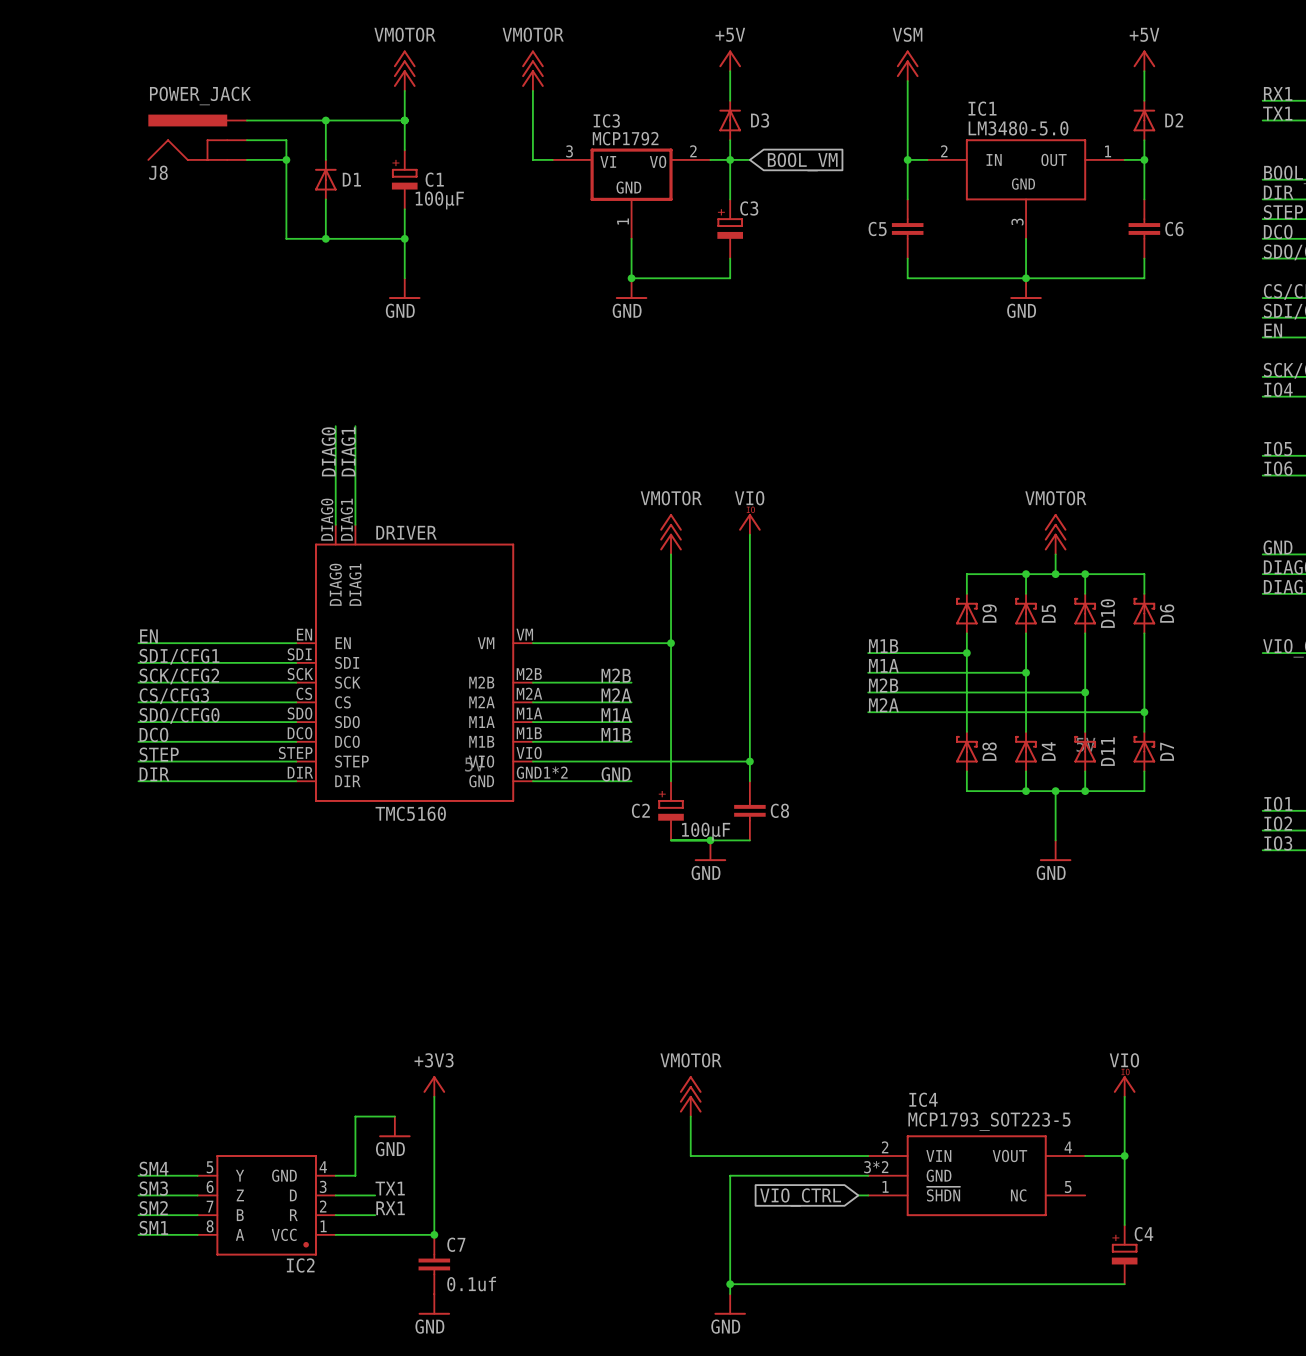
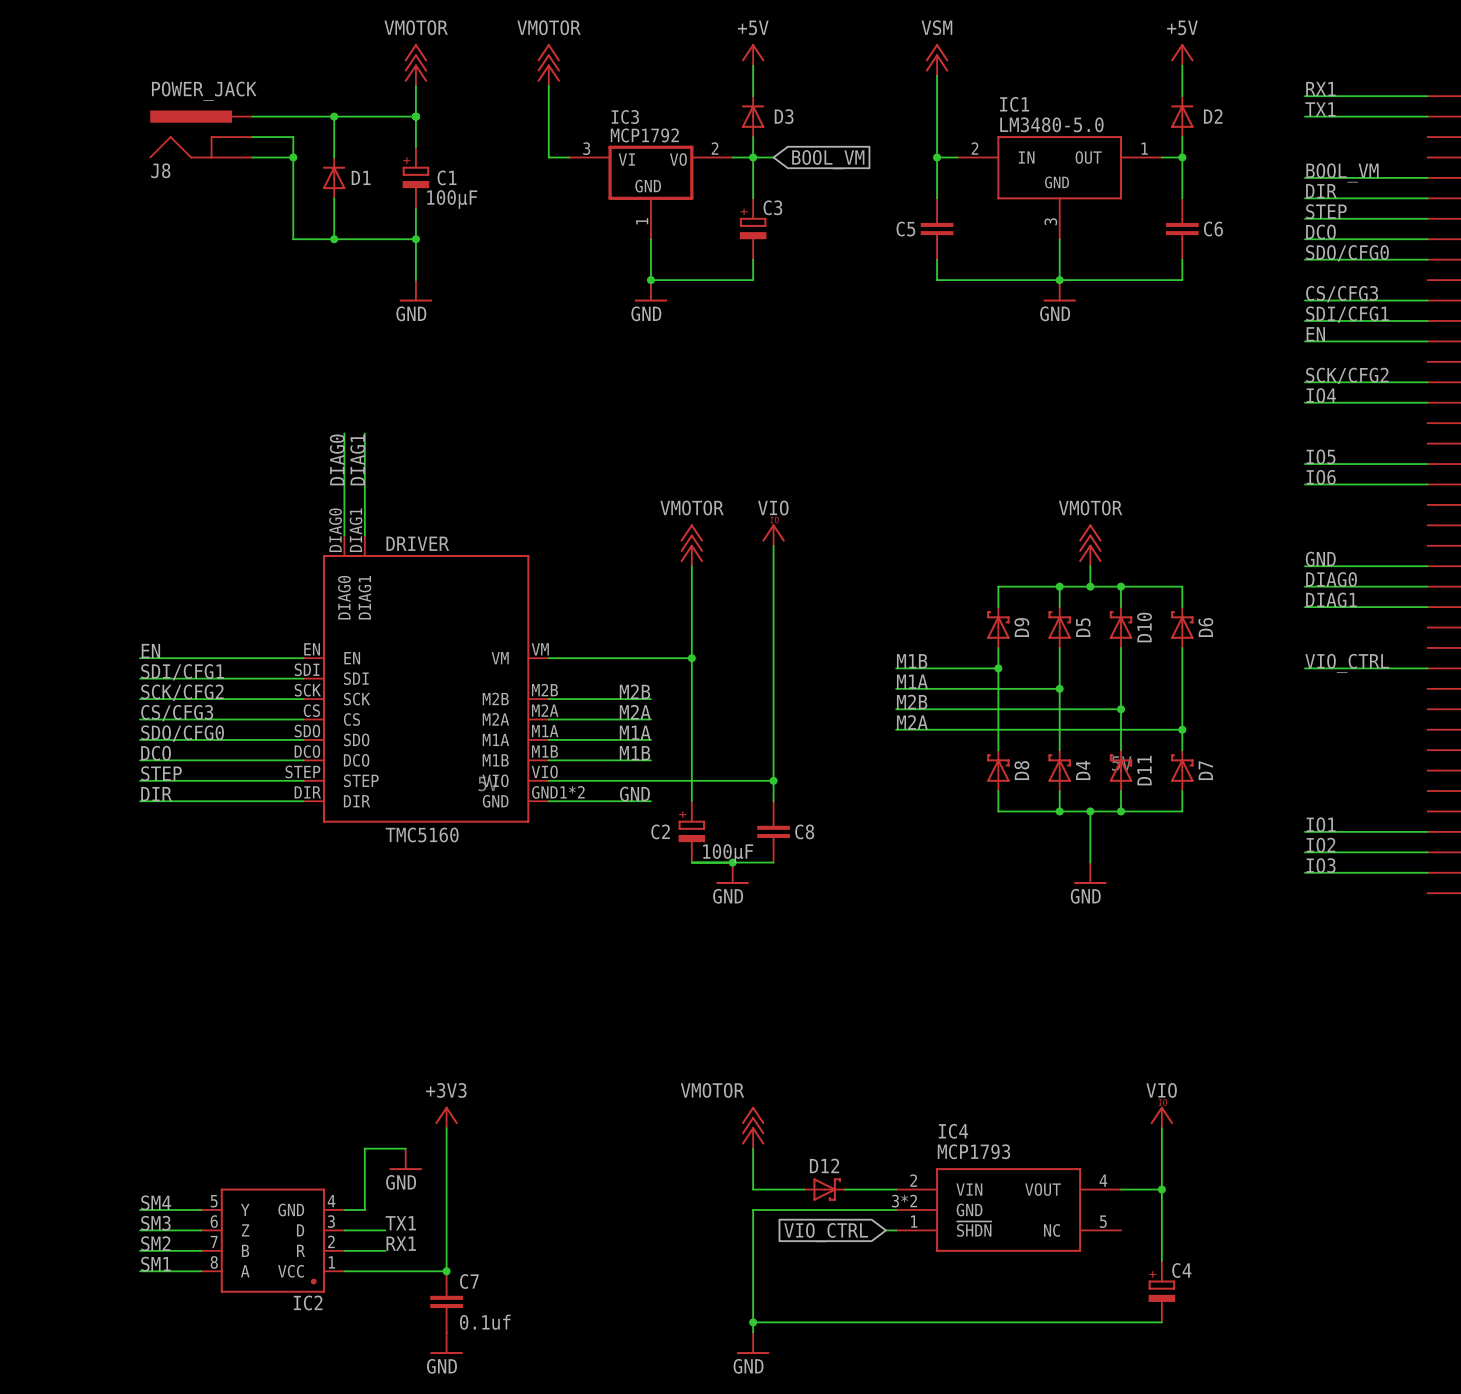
power symbol position: (690, 1096) -> (753, 1127)
wire: (690, 1116) (690, 1155) (730, 1155) -> (753, 1148) (753, 1189)
IC4 value: MCP1793_SOT223-5 (989, 1121) -> MCP1793 (973, 1151)
D12: none -> (824, 1189)

